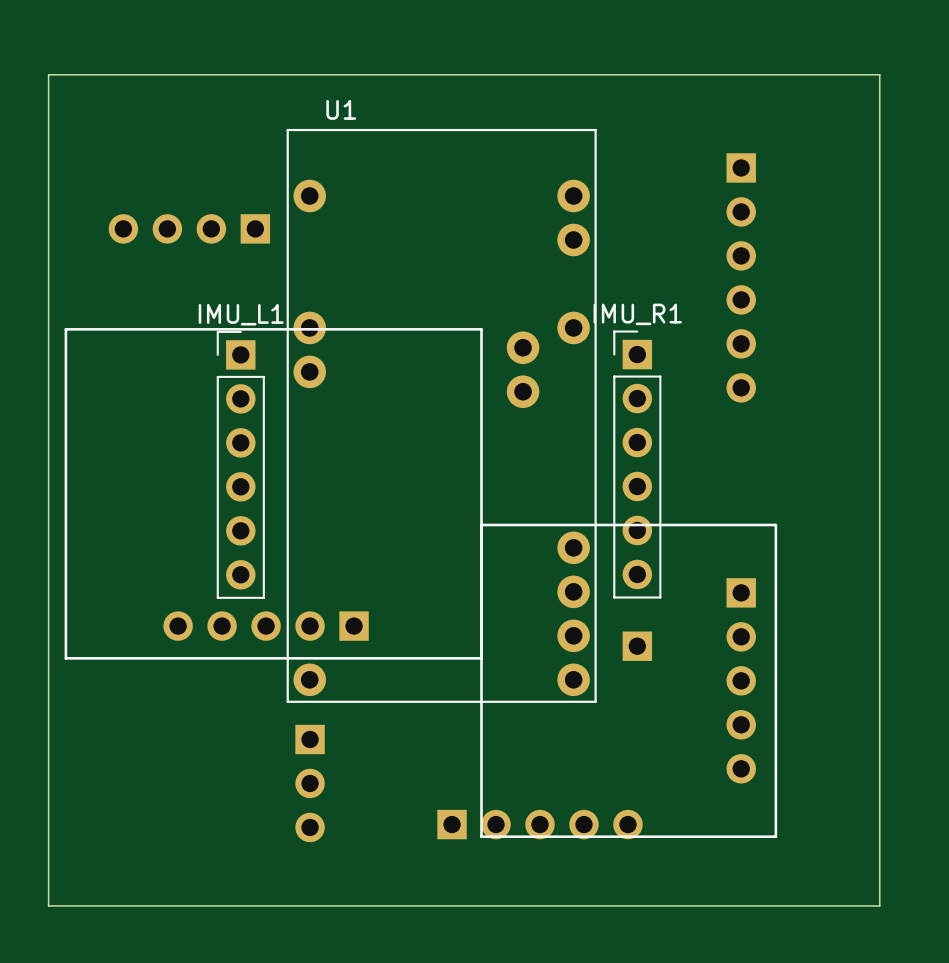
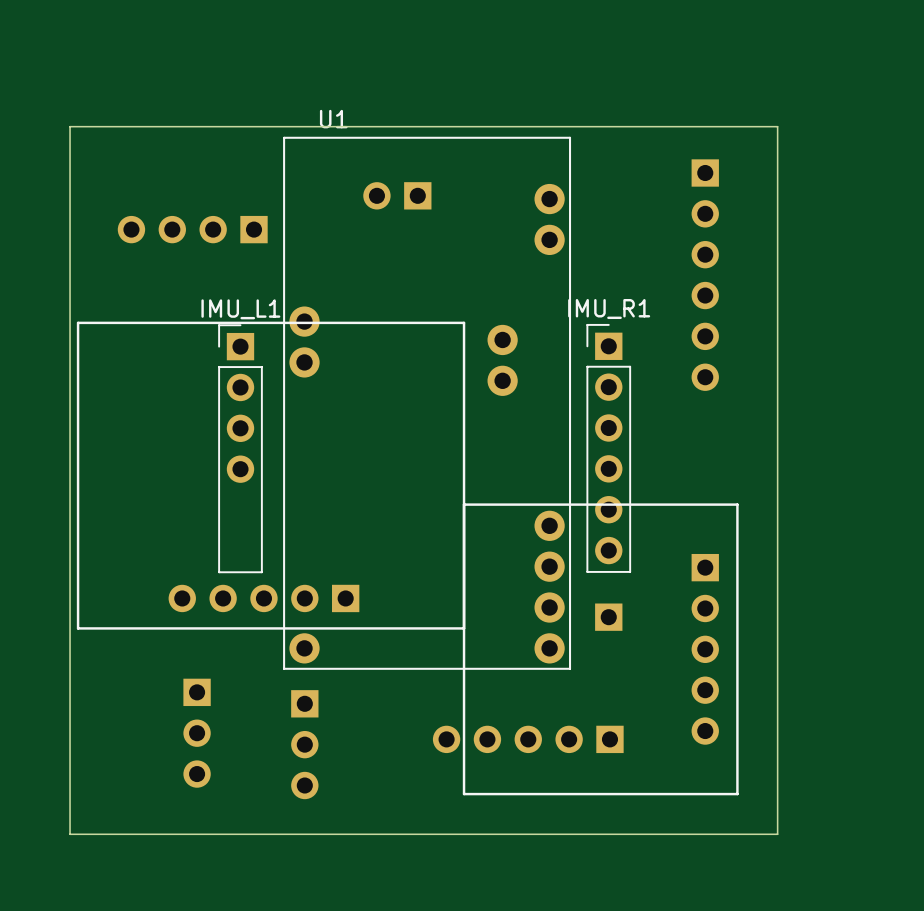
board edge: (879, 74) (879, 905) (48, 905) (48, 74) (879, 74) -> (777, 126) (777, 834) (70, 834) (70, 126) (777, 126)
U1 footprint: [286, 128, 597, 703] -> [283, 136, 572, 670]
part: none -> (397, 195)
IMU_L1 footprint: [216, 330, 265, 599] -> [218, 324, 263, 574]
part: none -> (197, 733)
part rotation: 0° (540, 824) -> 180° (528, 739)

